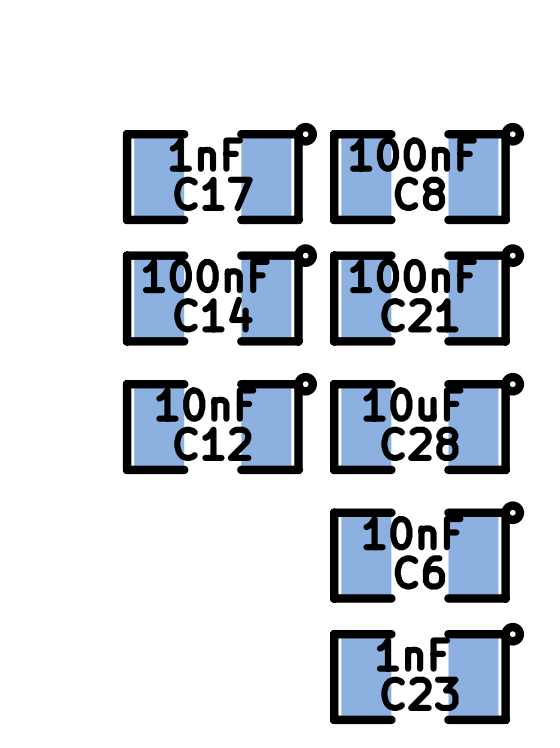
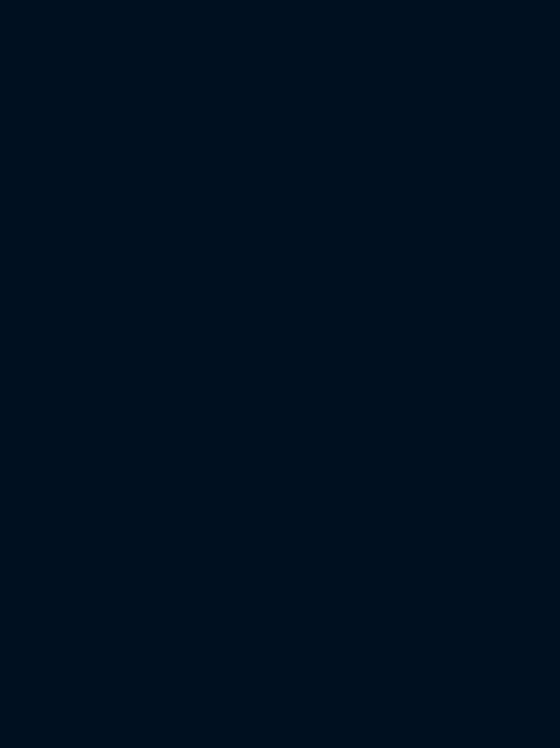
C17: 1nF (219, 173) -> none
C8: 100nF (427, 173) -> none
C14: 100nF (219, 294) -> none
C21: 100nF (427, 294) -> none
C12: 10nF (219, 423) -> none
C28: 10uF (427, 423) -> none
C6: 10nF (427, 552) -> none
C23: 1nF (427, 673) -> none

